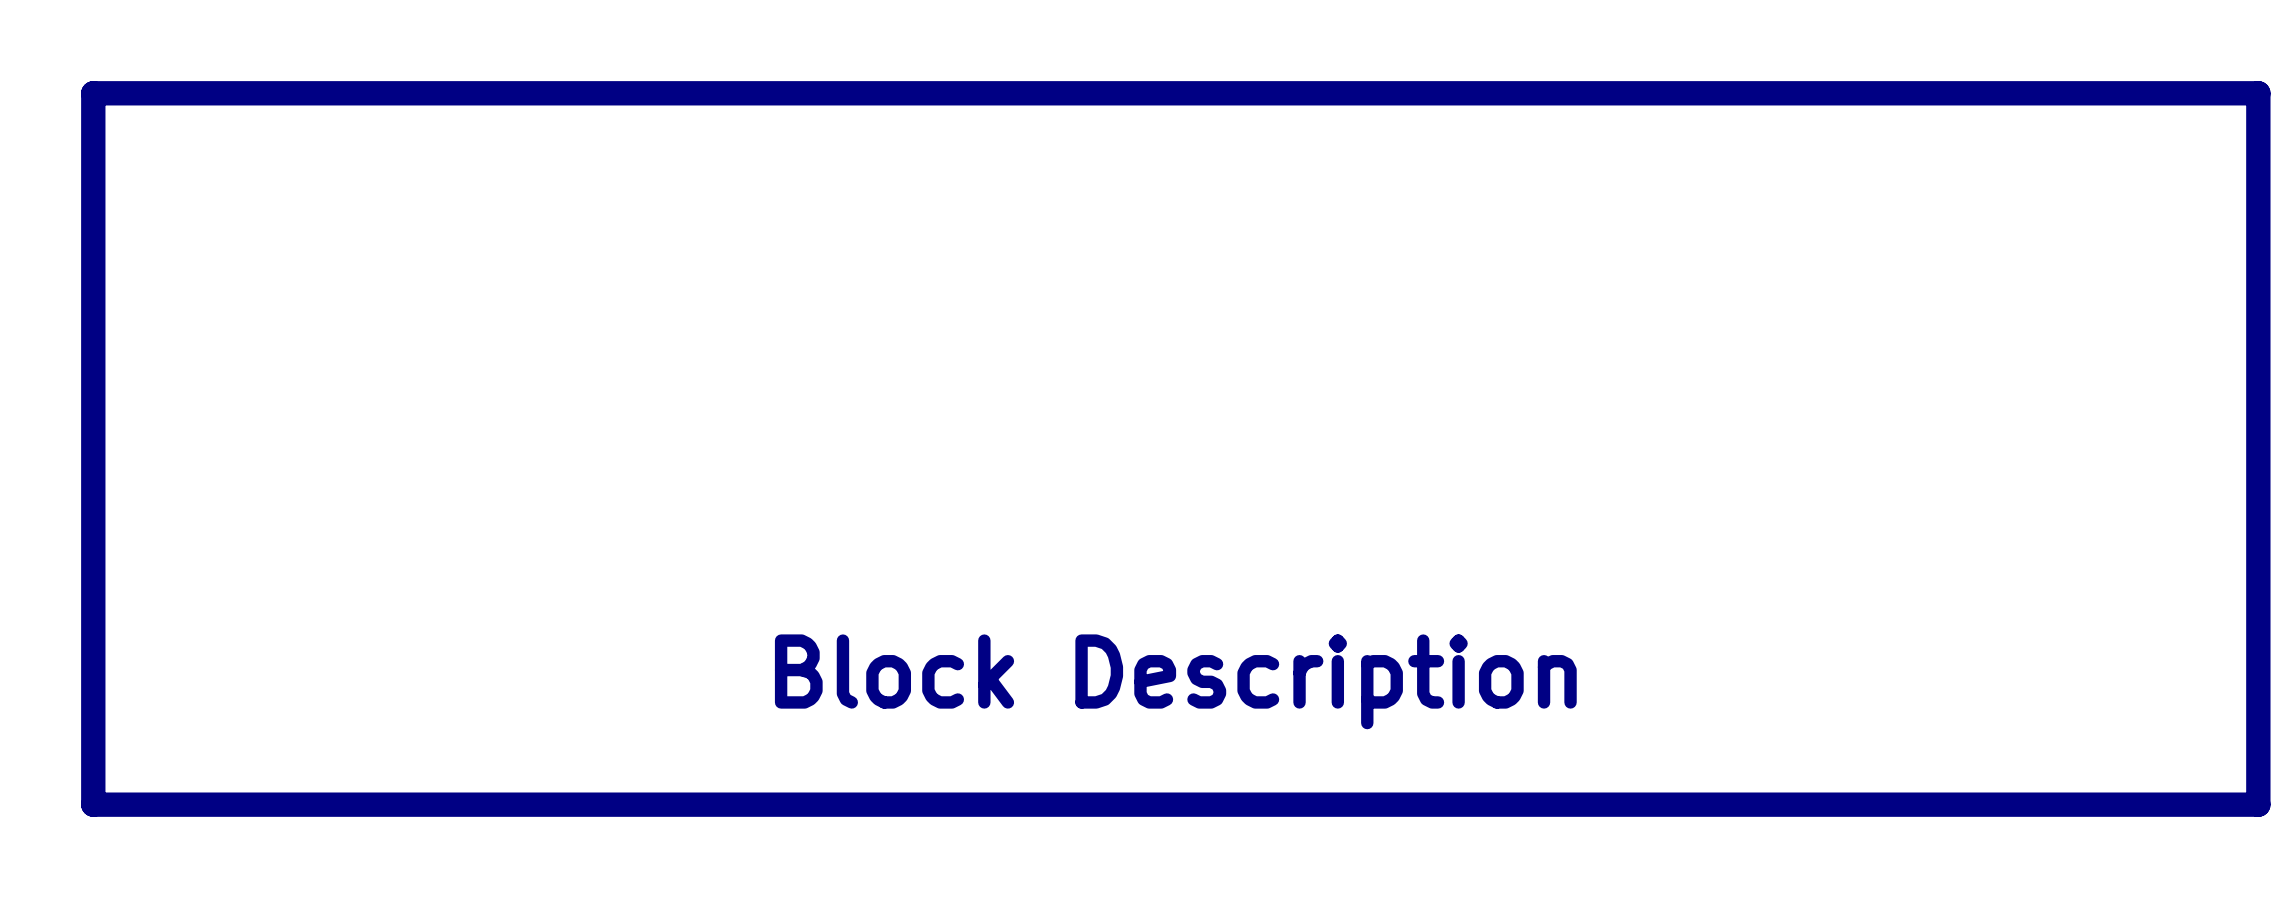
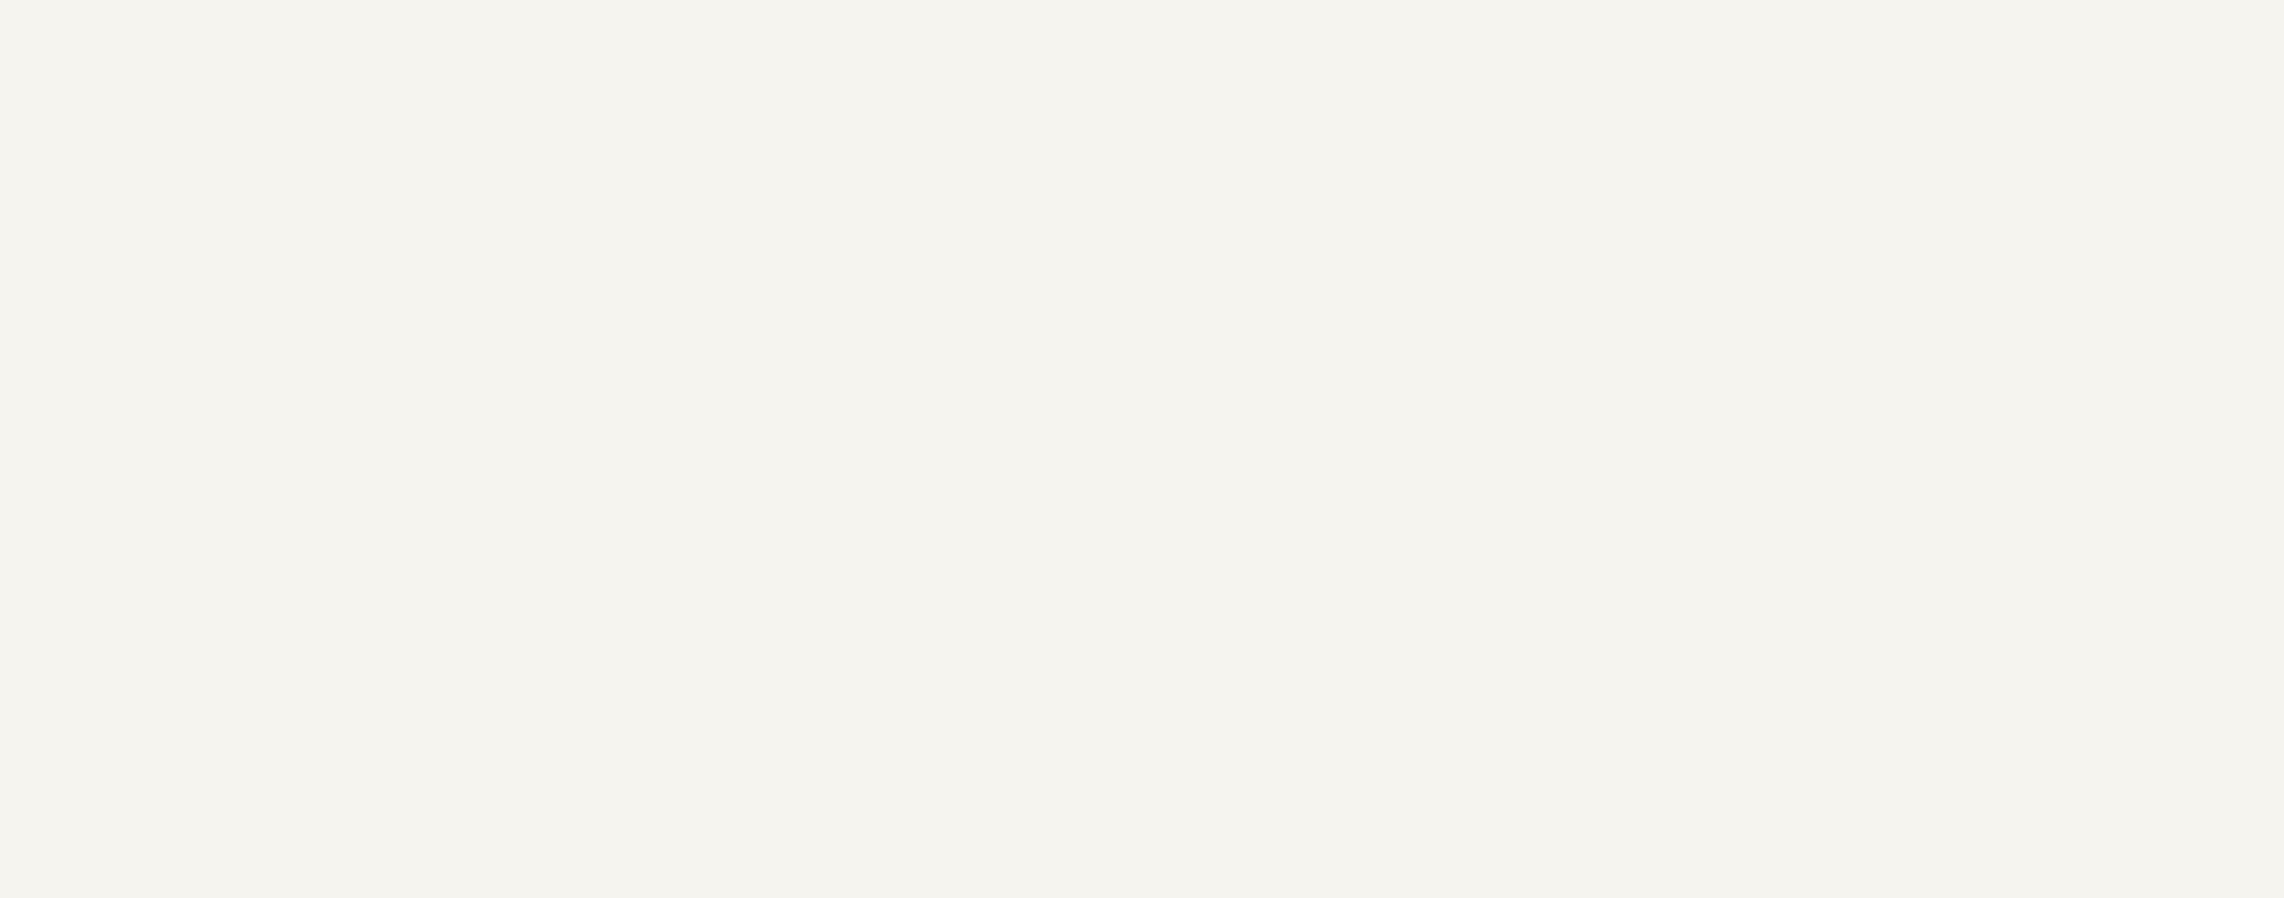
line: (93, 93) (93, 804) (2258, 804) (2258, 93) (93, 93) -> none
text: Block Description (1175, 681) -> none

